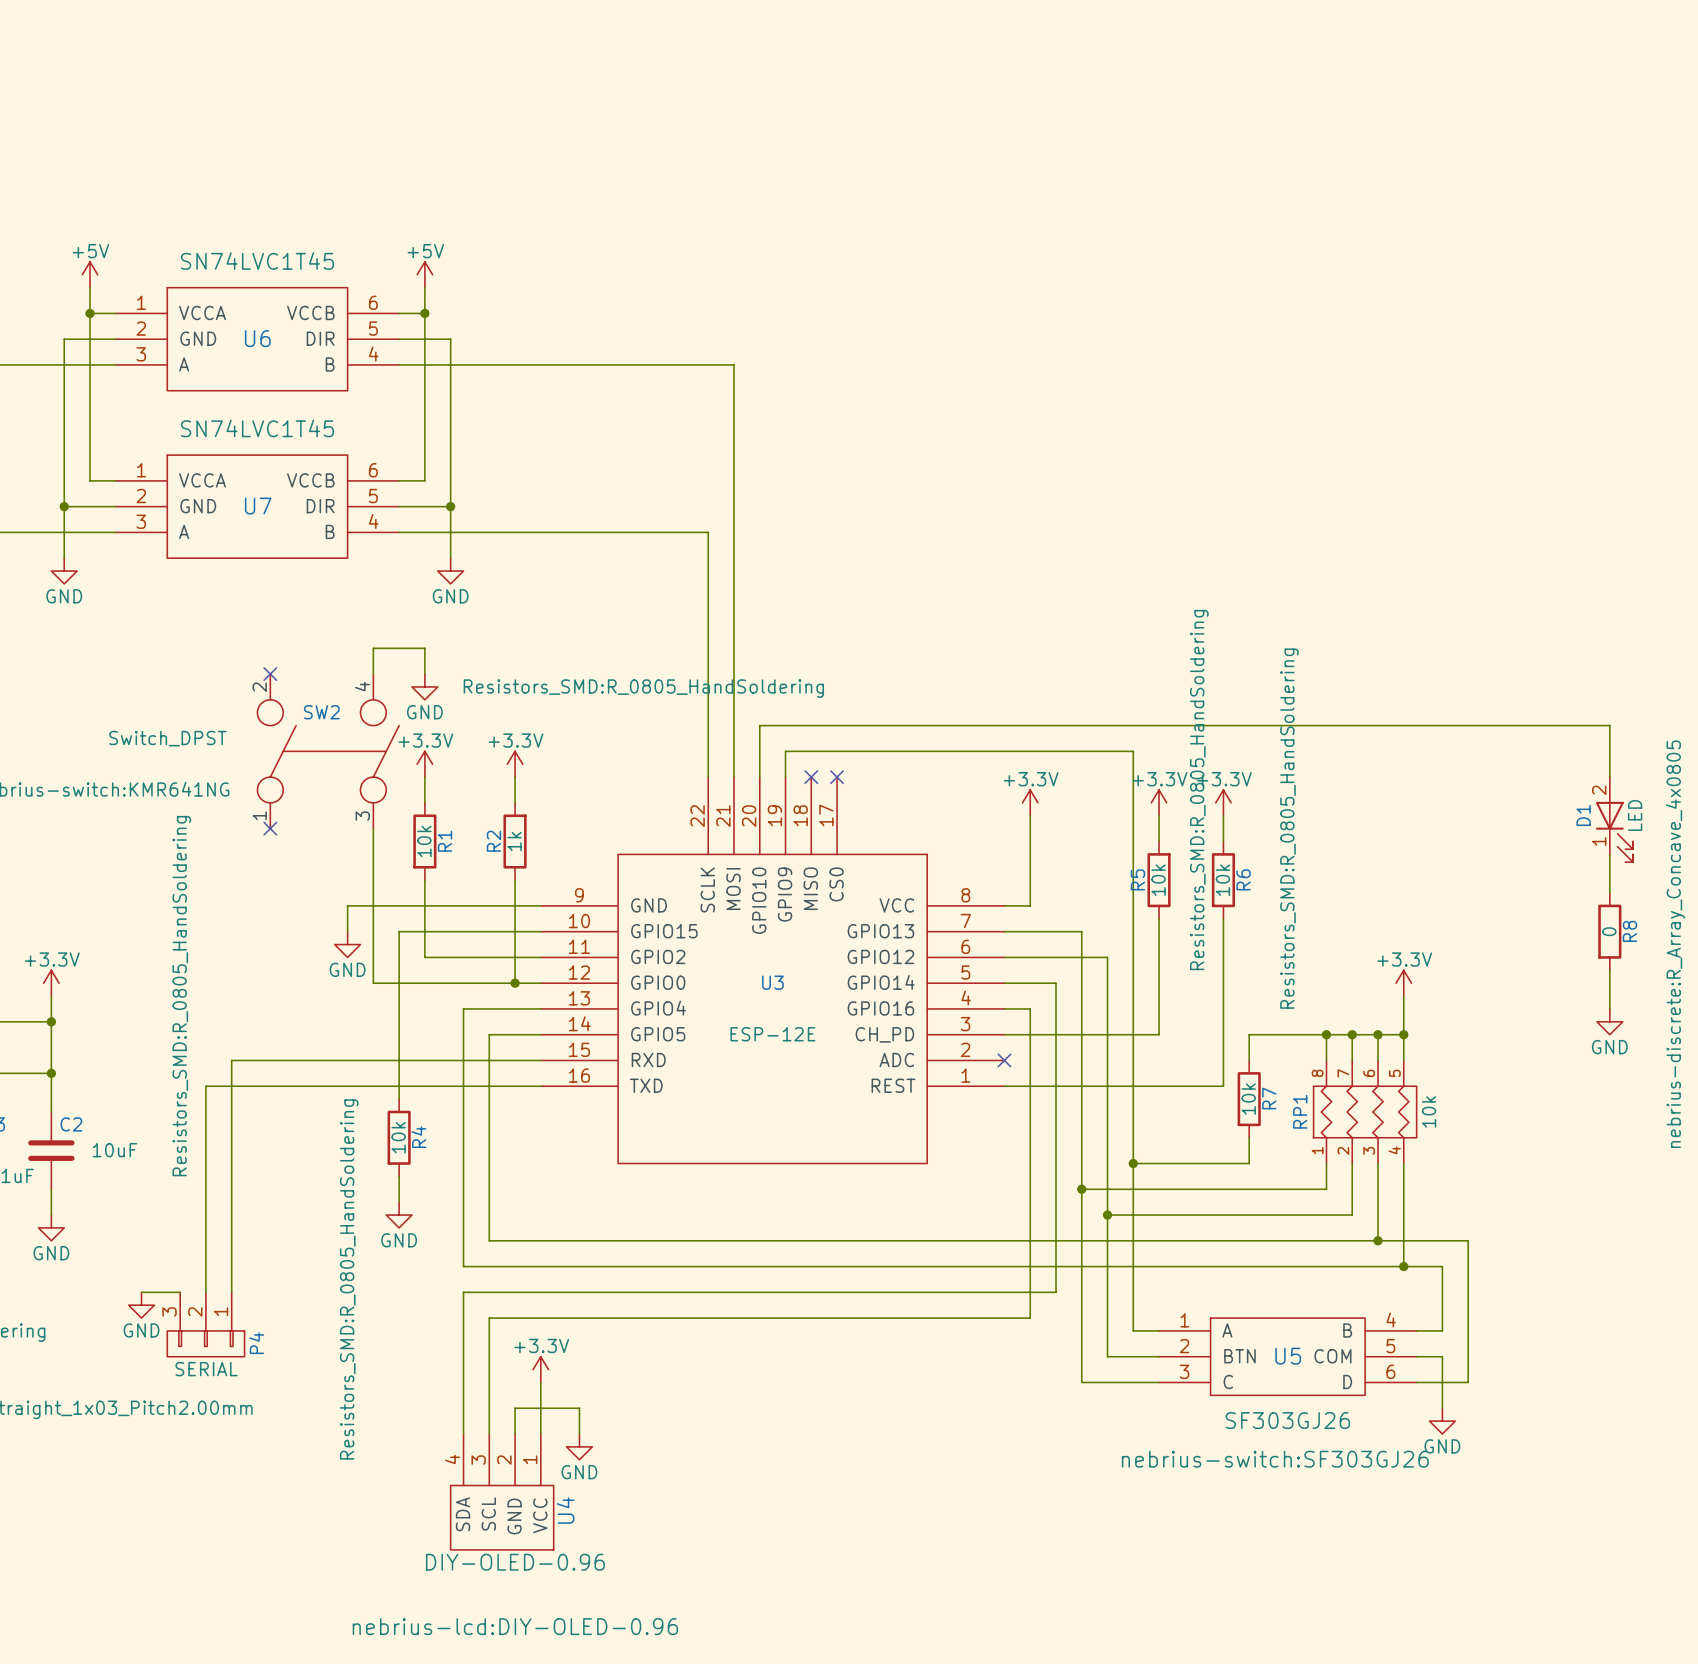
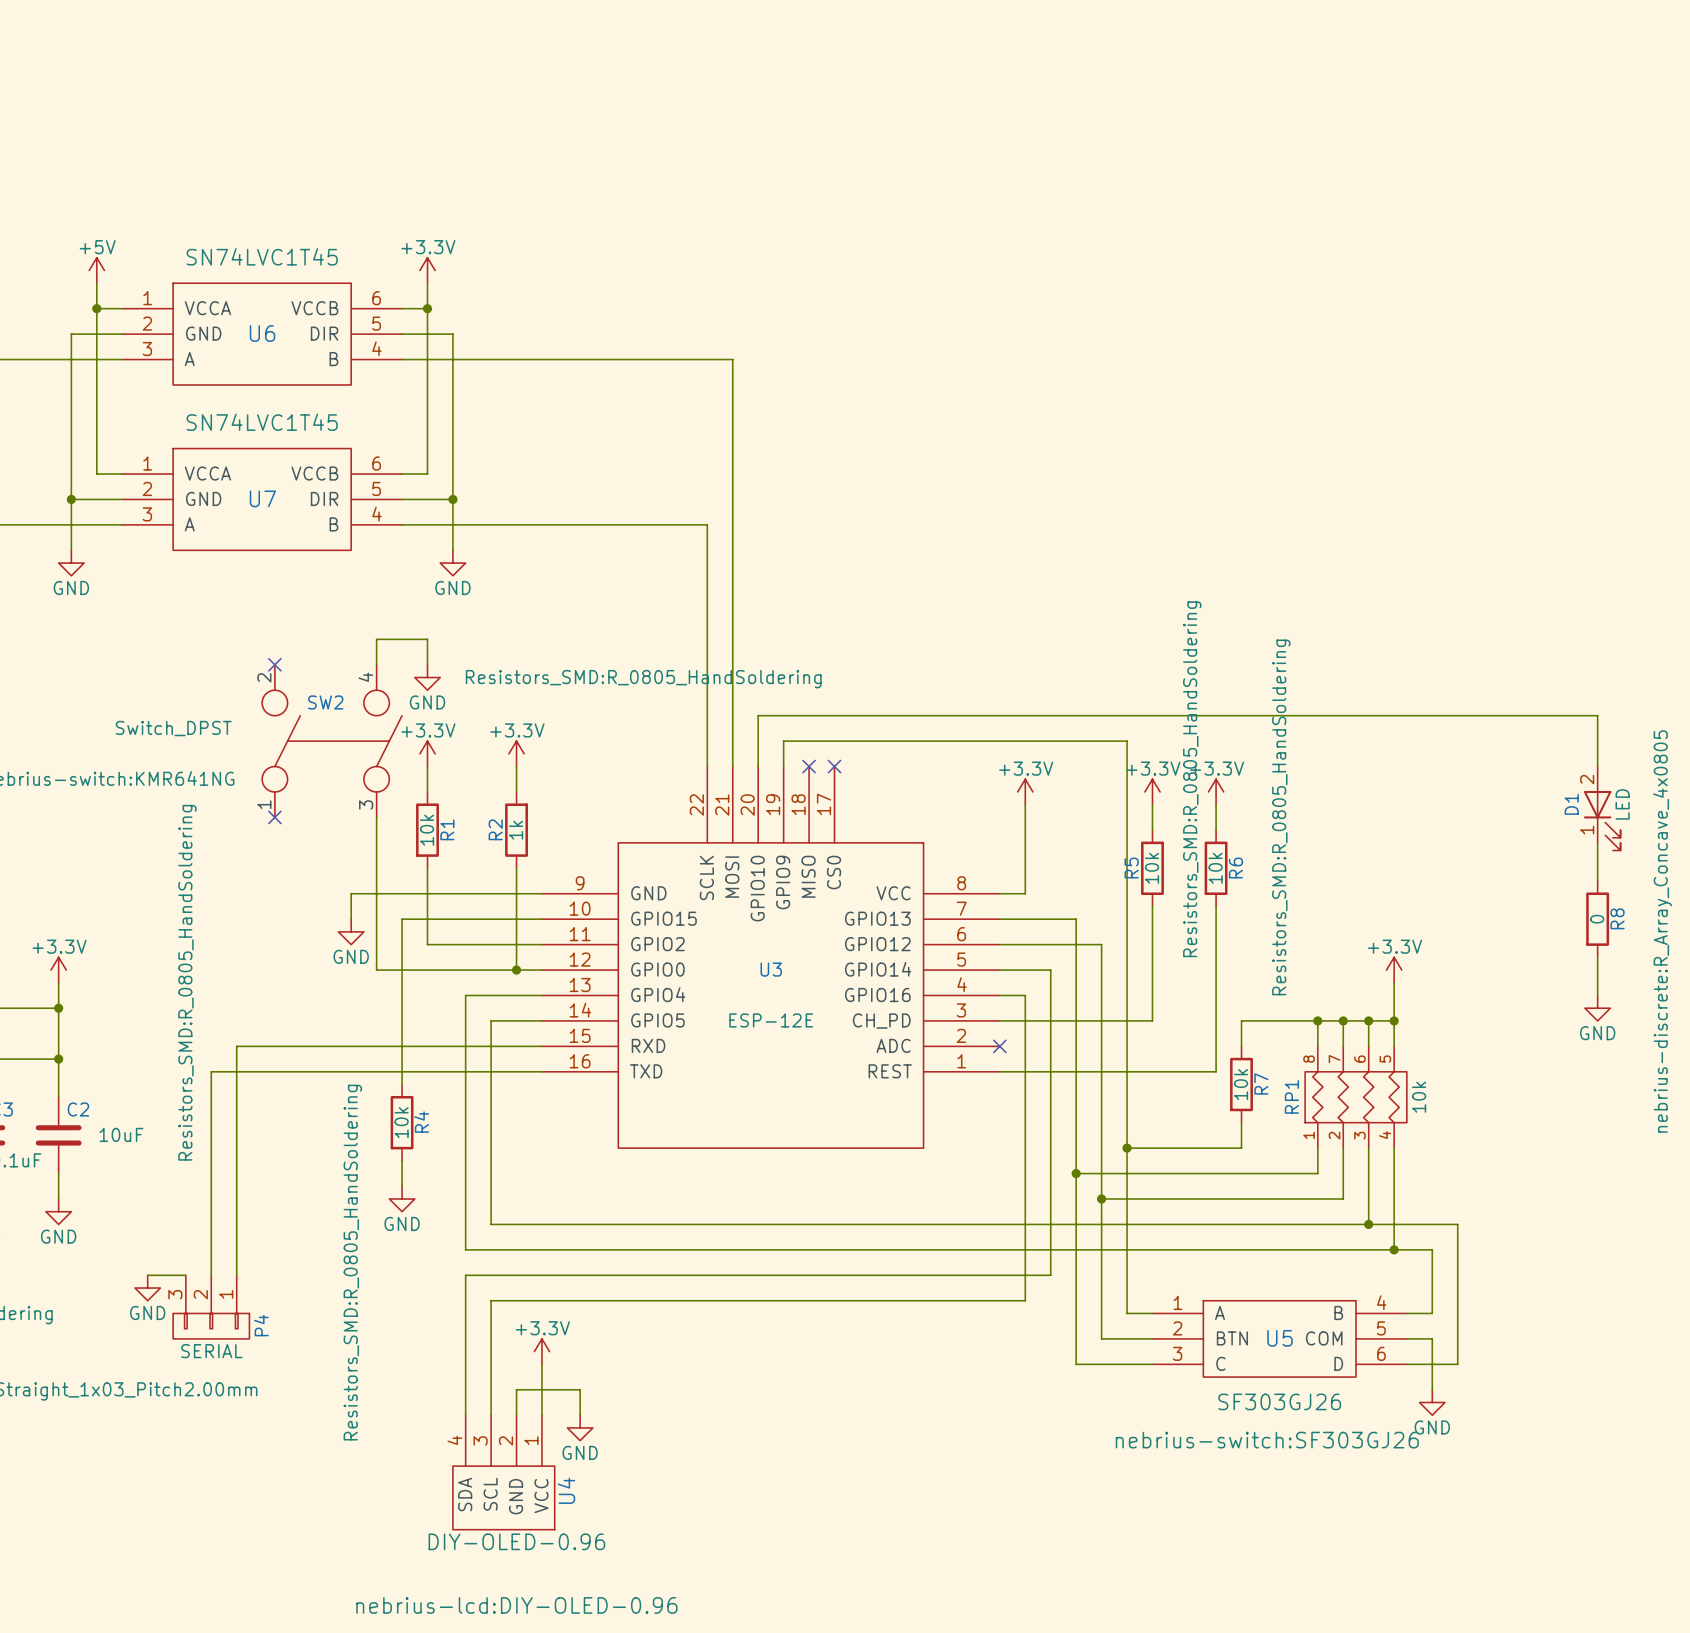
power symbol: +5V (424, 274) -> +3.3V (427, 270)

